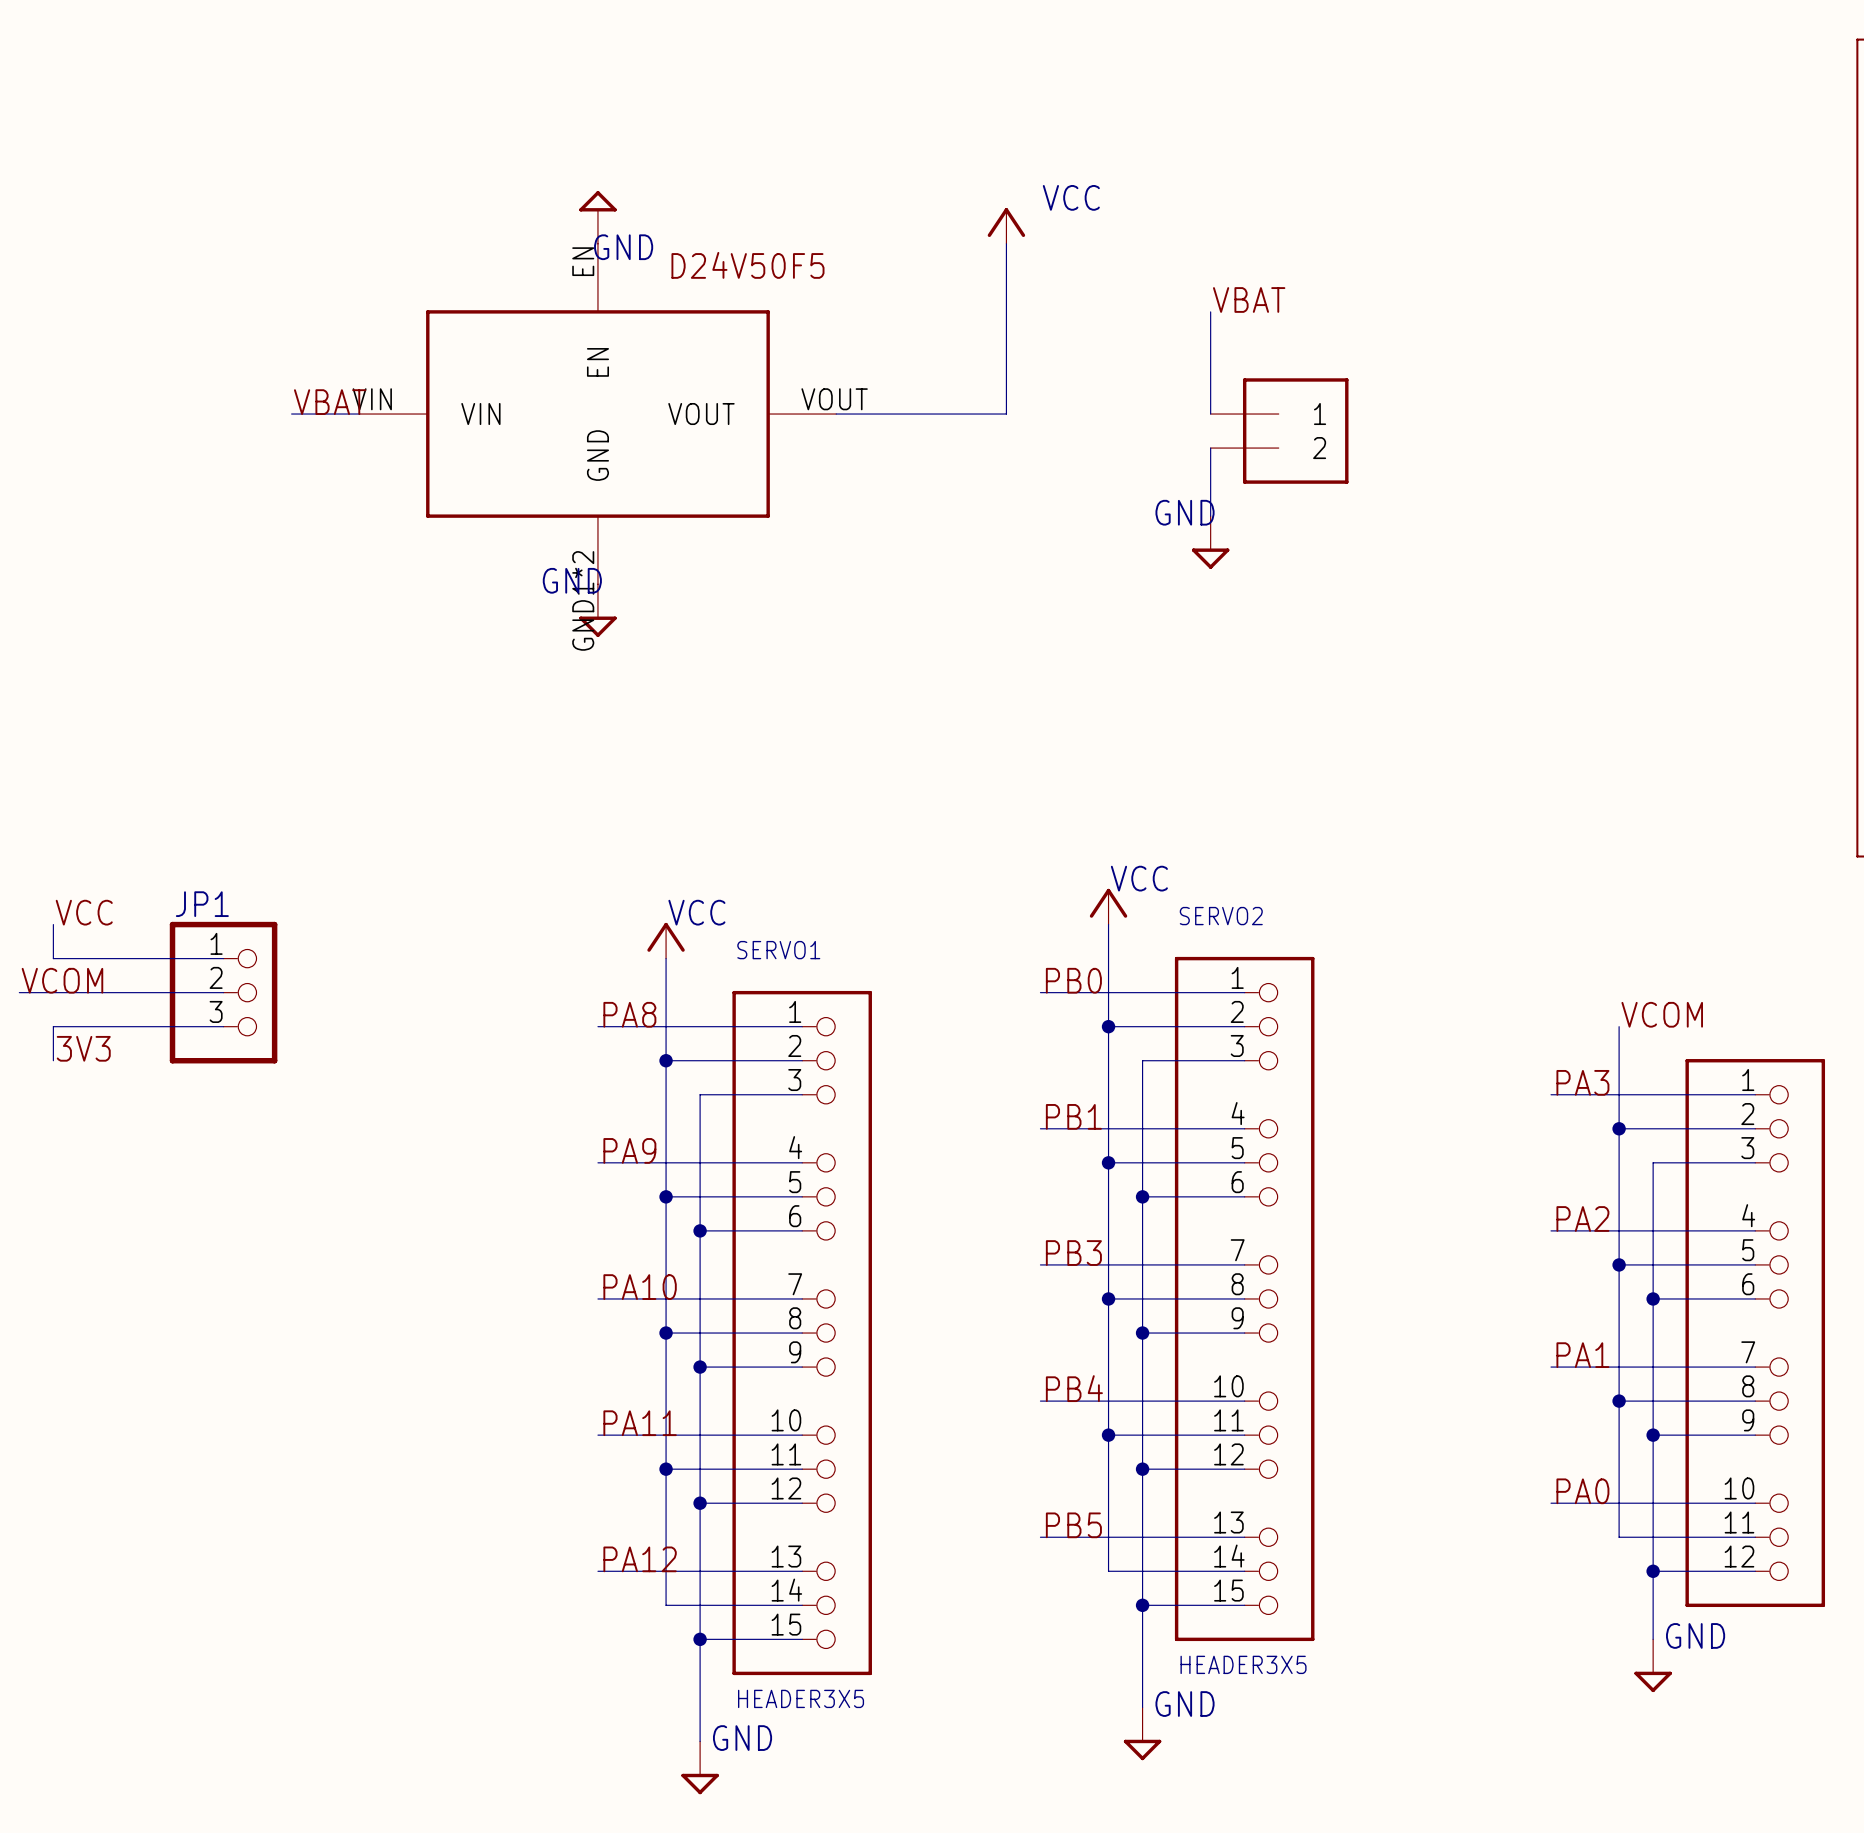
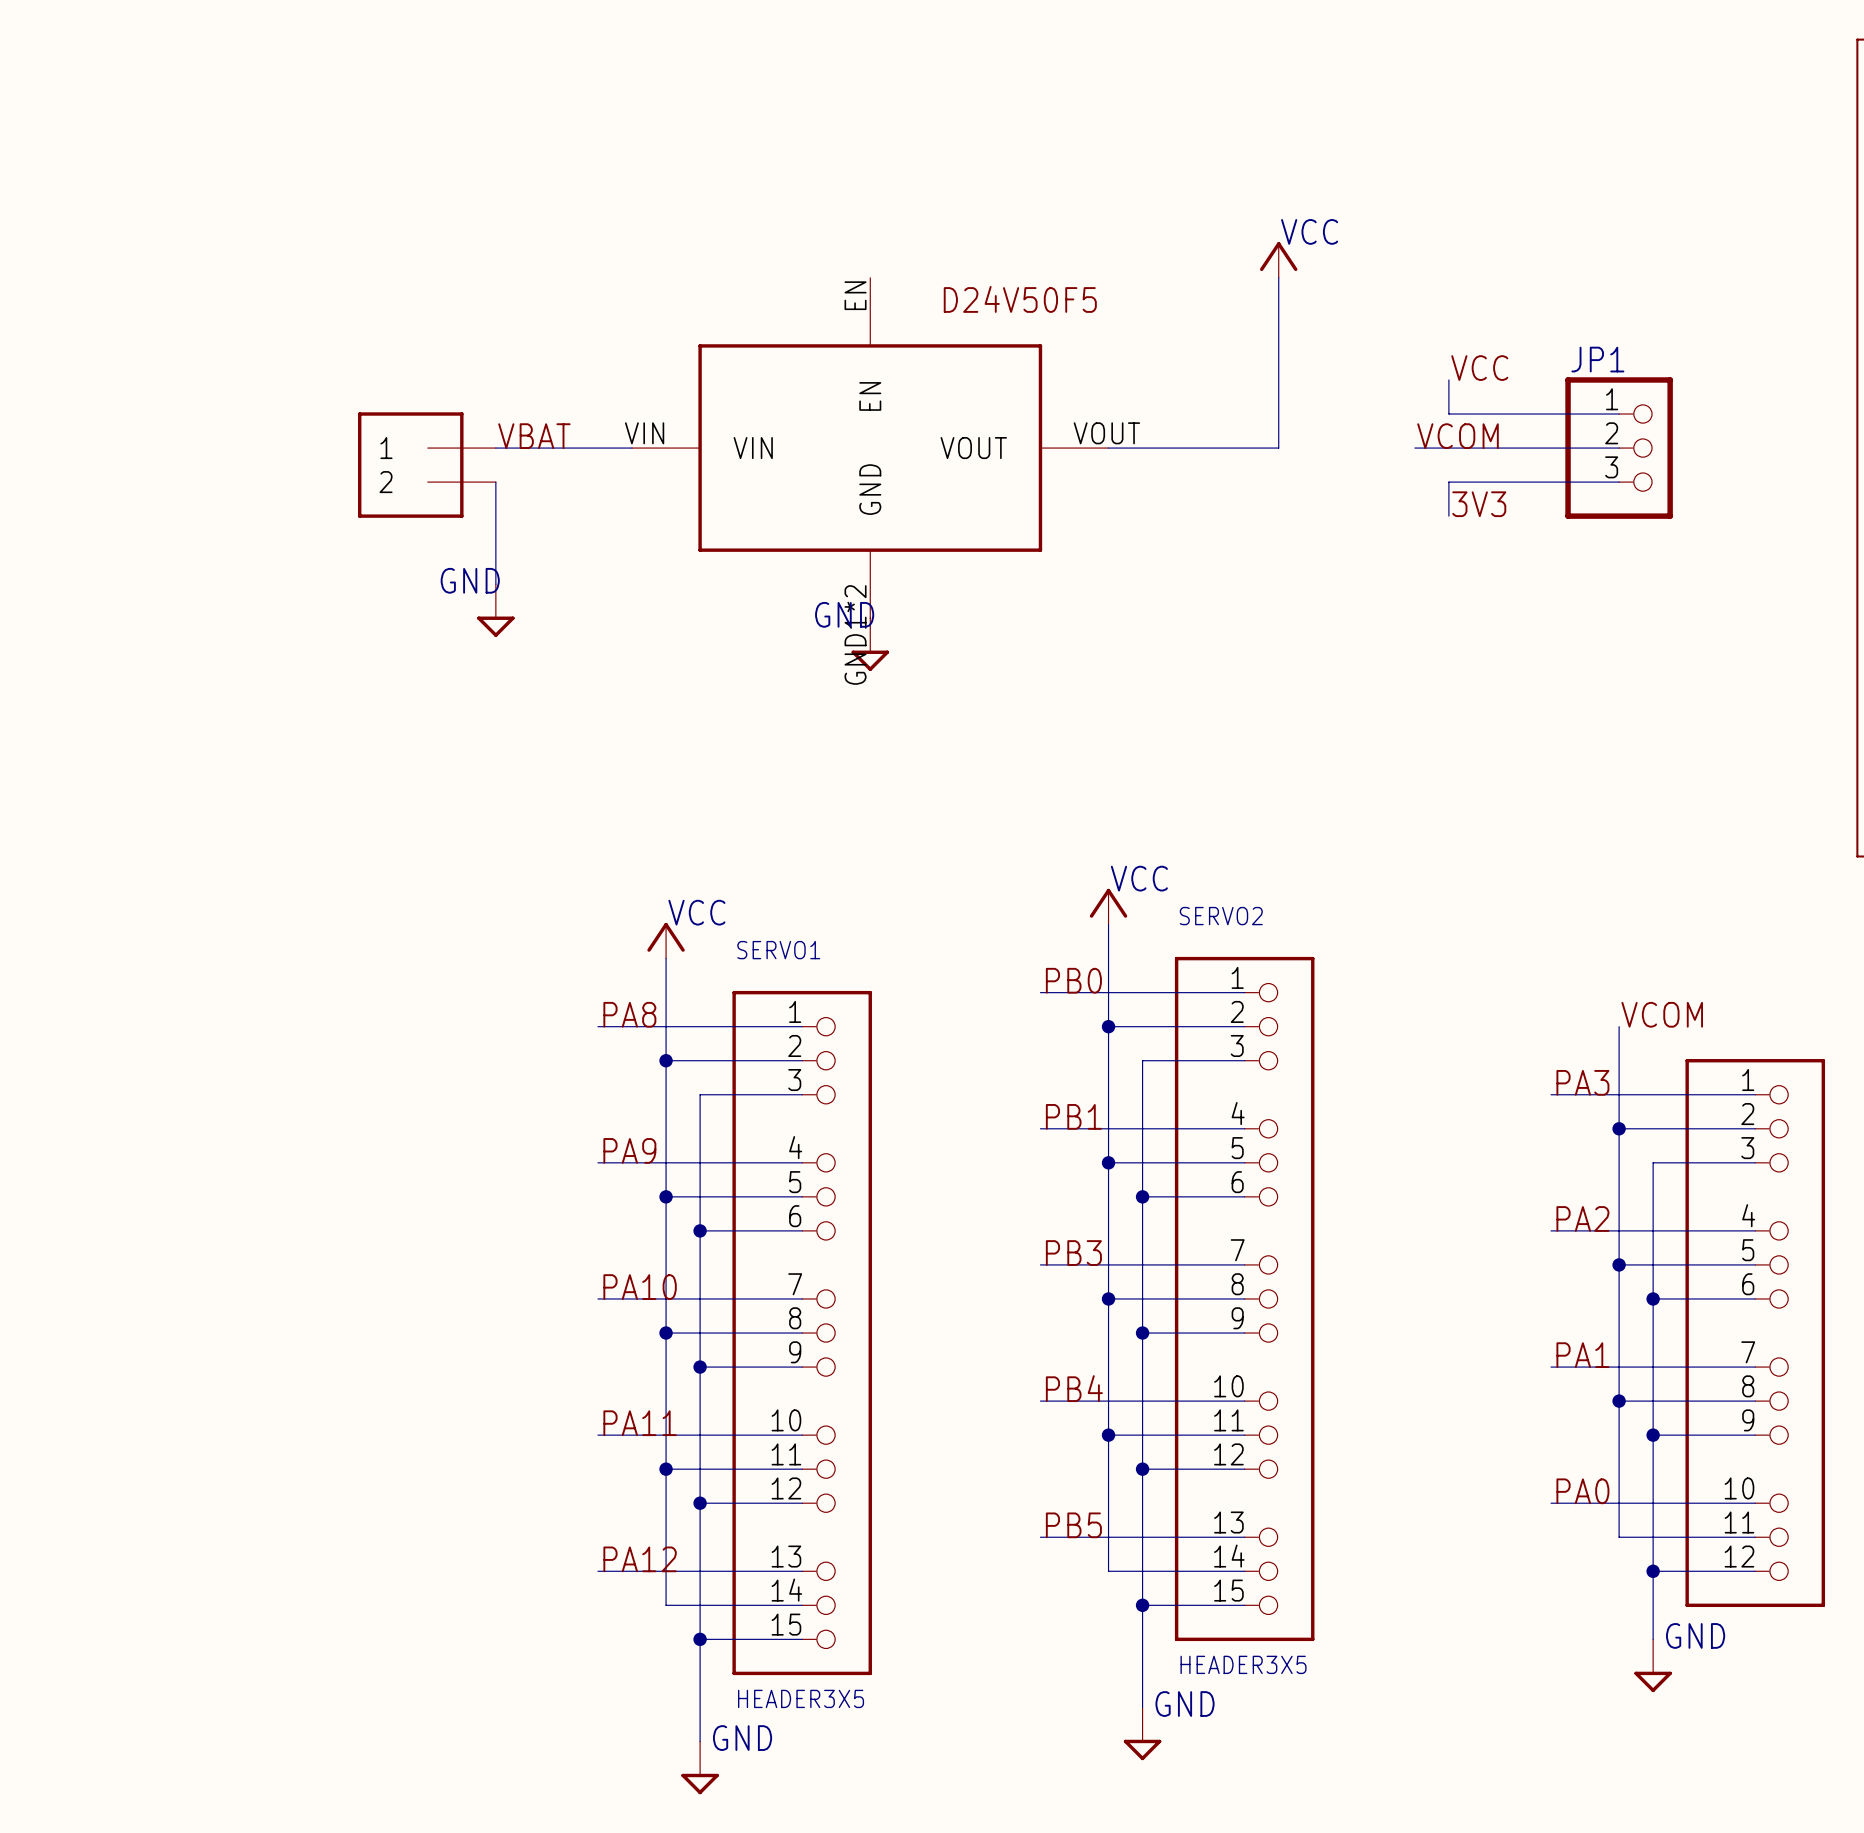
power symbol text position: VCC (1071, 197) -> VCC (1309, 231)
power symbol: GND (597, 217) -> none
power symbol position: VCC (1006, 225) -> VCC (1278, 259)
wire: (1006, 243) (1006, 414) (836, 414) -> (1278, 277) (1278, 448) (1108, 448)
label: VBAT (1249, 299) -> none
wire: (1210, 311) (1210, 414) -> none
label: none -> VCC (1479, 368)
wire: none -> (1448, 379) (1448, 414) (1619, 414)
label position: VBAT (330, 402) -> VBAT (534, 436)
wire: (291, 414) (359, 414) -> none
part position: (597, 414) -> (870, 448)
part: (1279, 431) -> none
label: none -> VCOM (1457, 436)
wire: none -> (495, 448) (632, 448)
wire: (1210, 448) (1210, 516) -> none
wire: none -> (1414, 448) (1619, 448)
part: none -> (426, 465)
wire: none -> (495, 482) (495, 584)
wire: none -> (1619, 482) (1448, 482) (1448, 516)
label: none -> 3V3 (1479, 504)
power symbol: GND (1210, 542) -> none
power symbol position: GND (597, 610) -> GND (495, 610)
power symbol: none -> GND (870, 644)
label: VCC (84, 912) -> none
wire: (53, 924) (53, 958) (223, 958) -> none
label: VCOM (62, 980) -> none
wire: (19, 992) (223, 992) -> none
JP1 position: (223, 992) -> (1619, 448)
wire: (223, 1026) (53, 1026) (53, 1060) -> none
label: 3V3 (83, 1048) -> none

